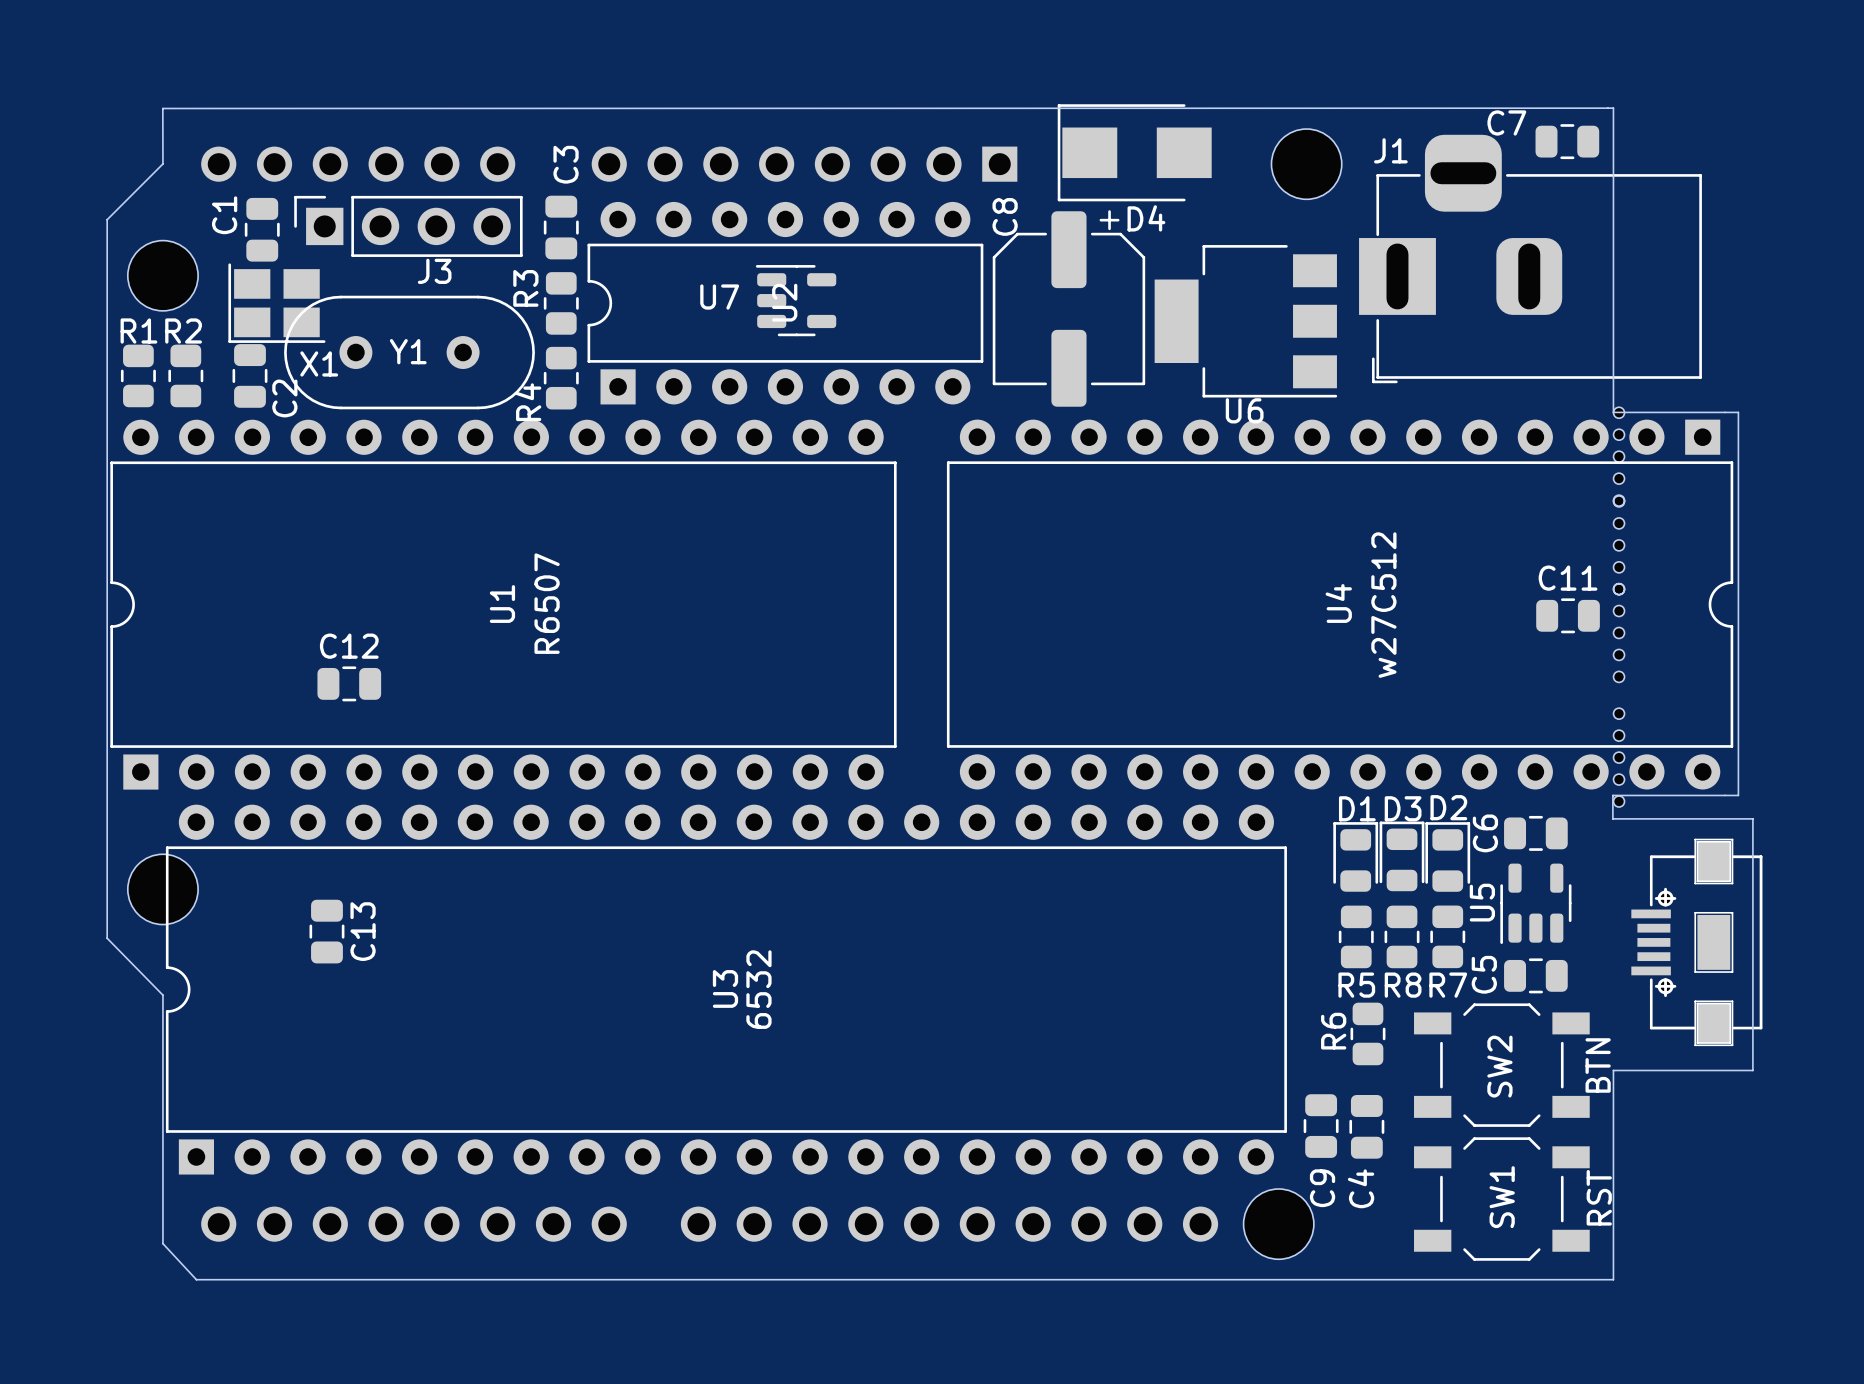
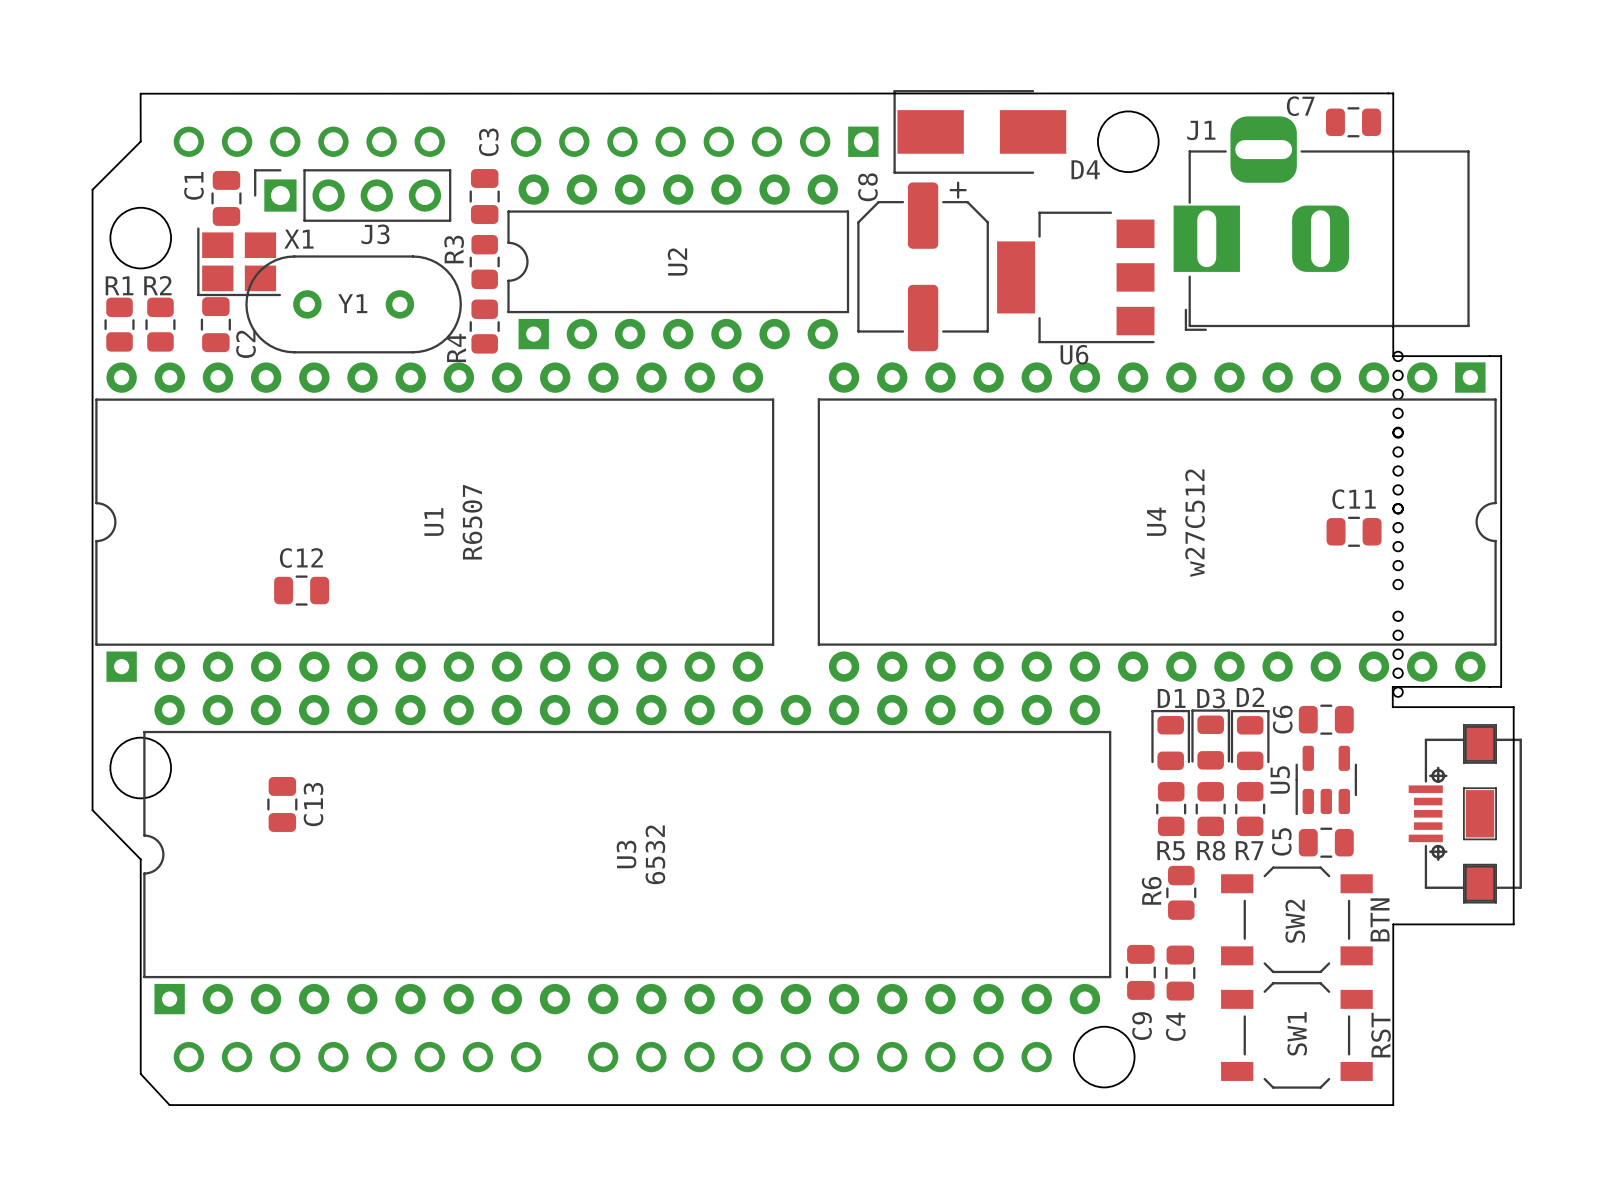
D4 footprint: [1057, 104, 1212, 202] -> [893, 90, 1067, 174]
D4 name position: D4 (1146, 218) -> D4 (1085, 169)
U7: (796, 300) -> none
X1 name position: X1 (319, 363) -> X1 (298, 239)

